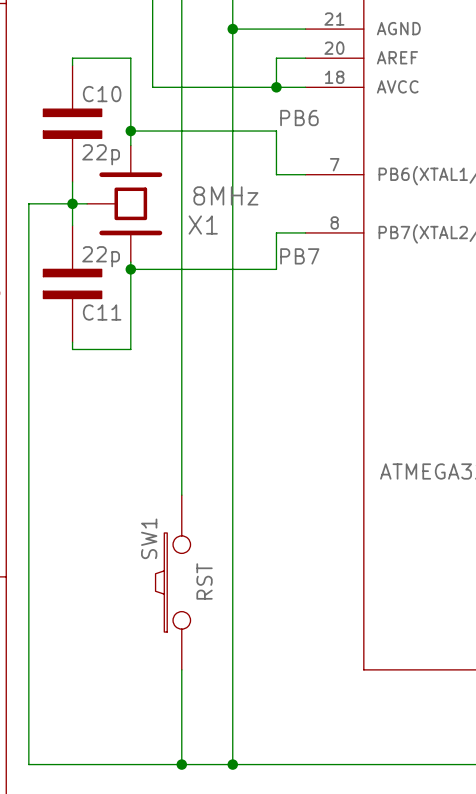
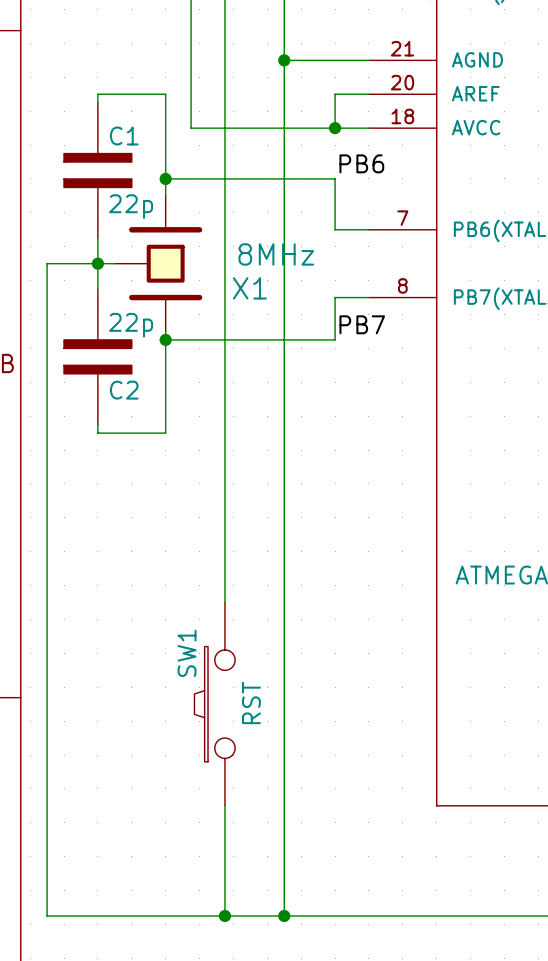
C10 name: C10 (102, 94) -> C1 (124, 135)
C11 name: C11 (102, 312) -> C2 (124, 390)

